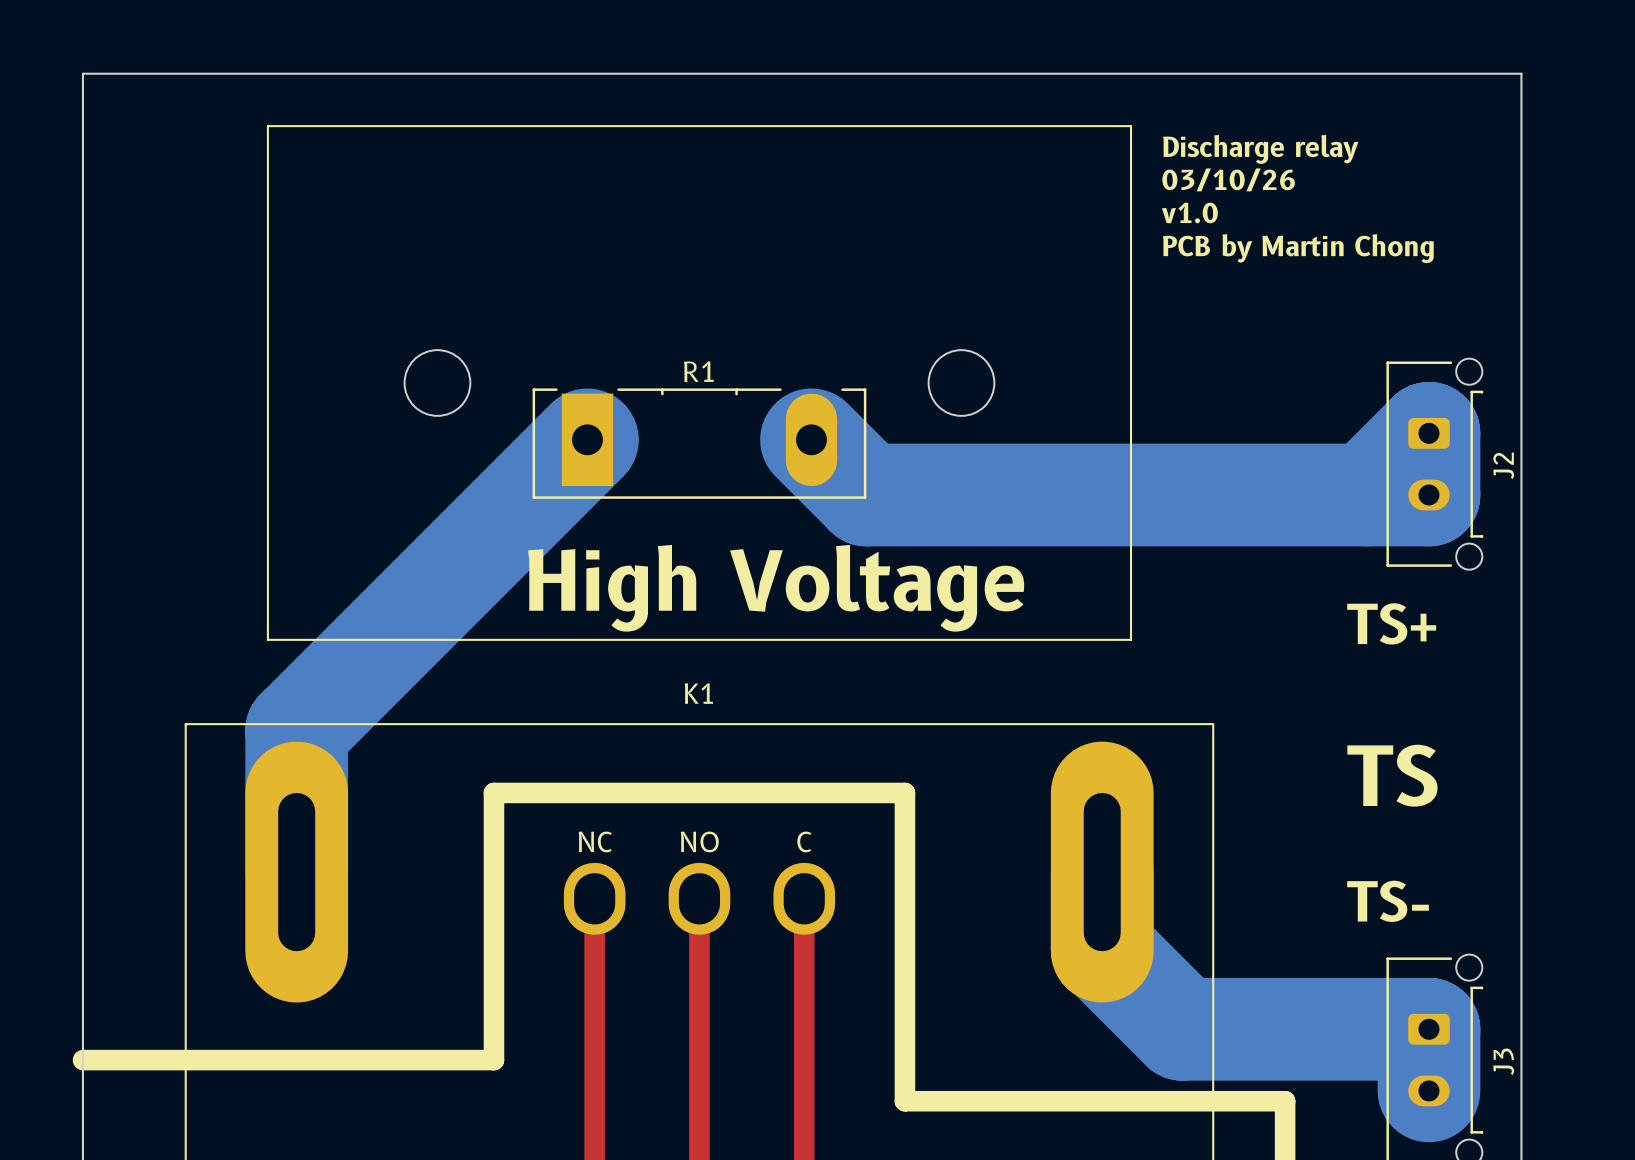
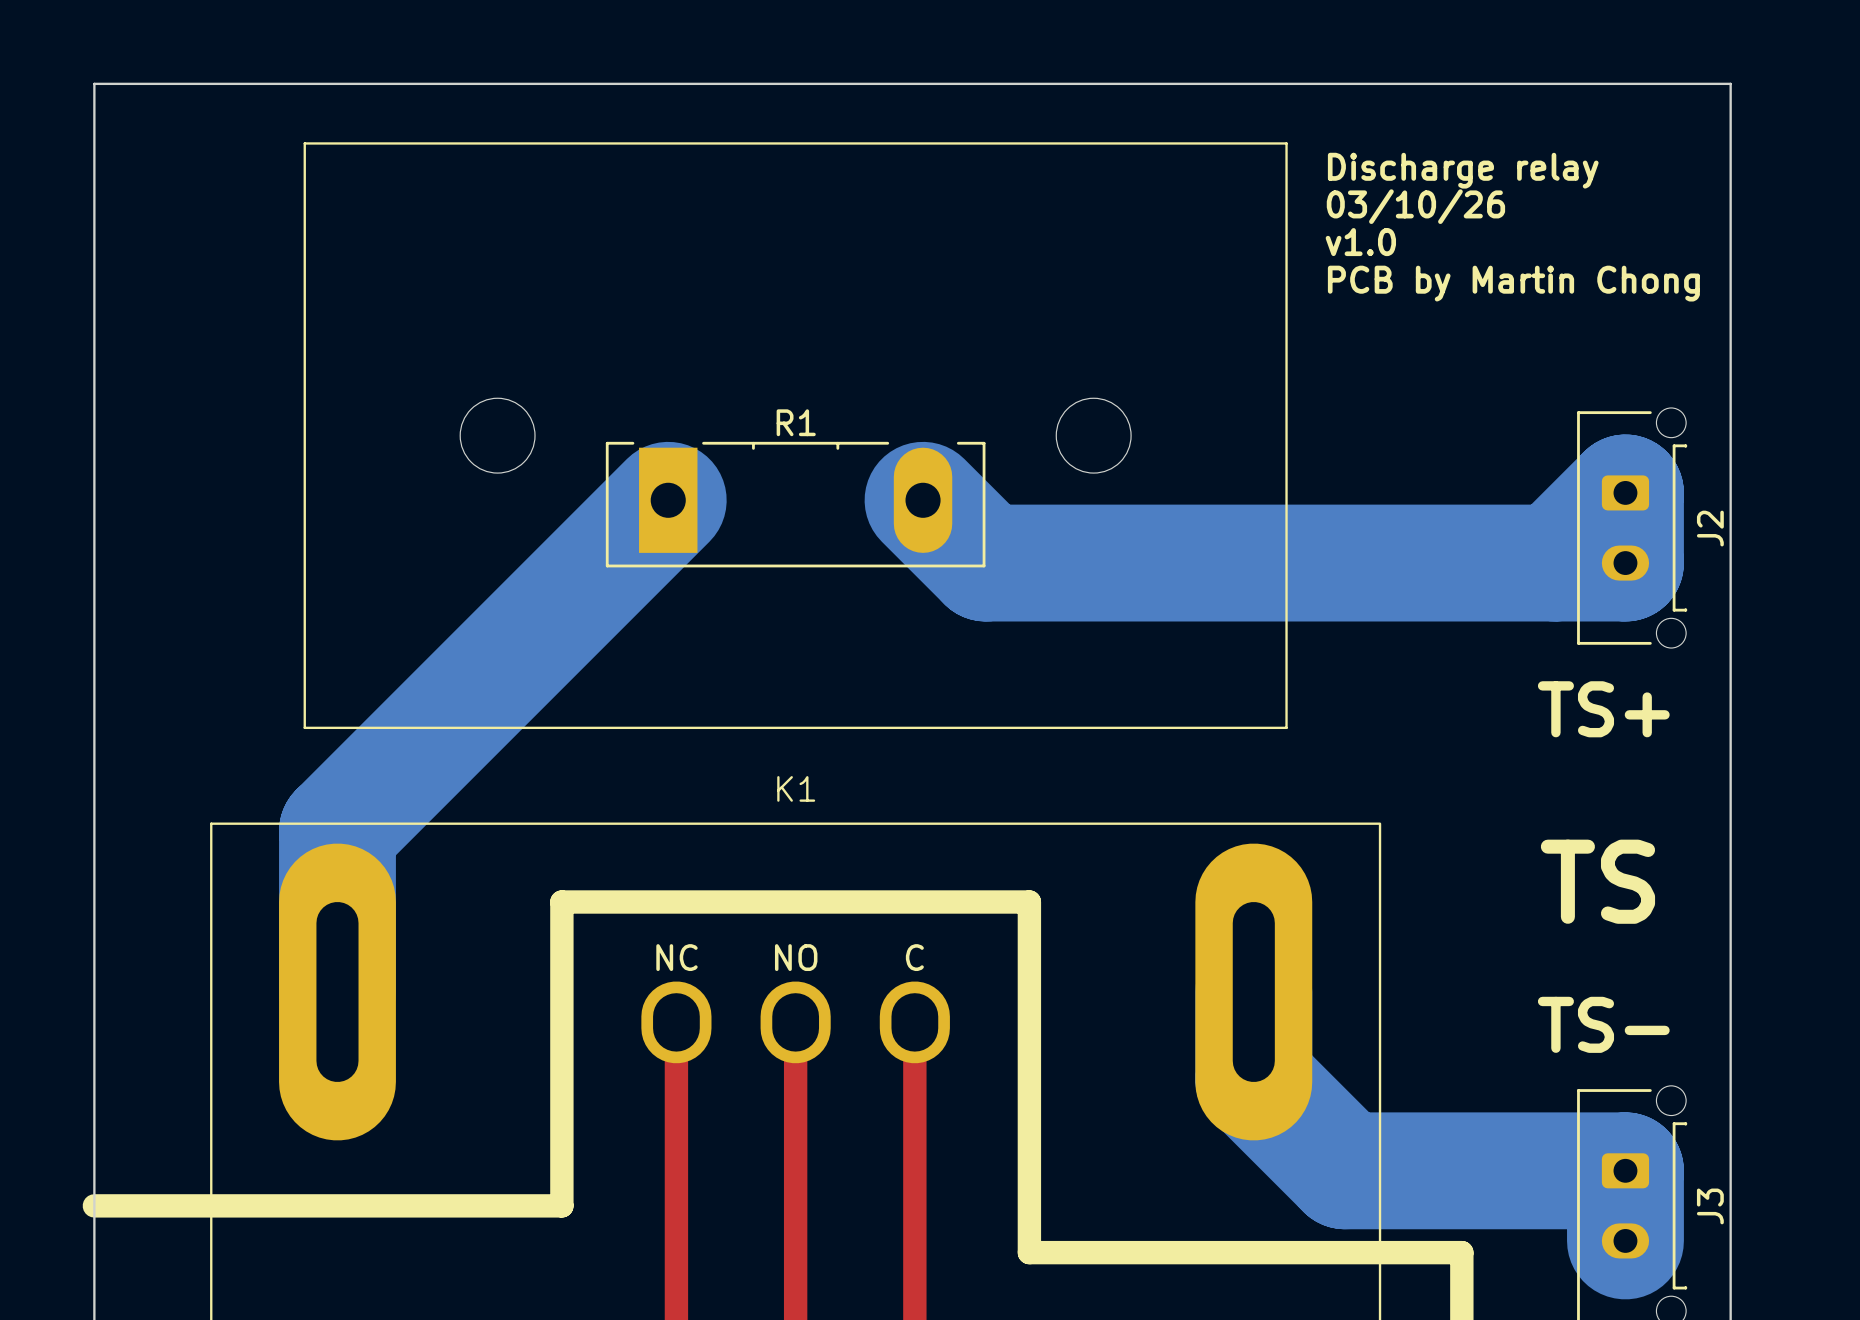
text: High Voltage (776, 588) -> none

